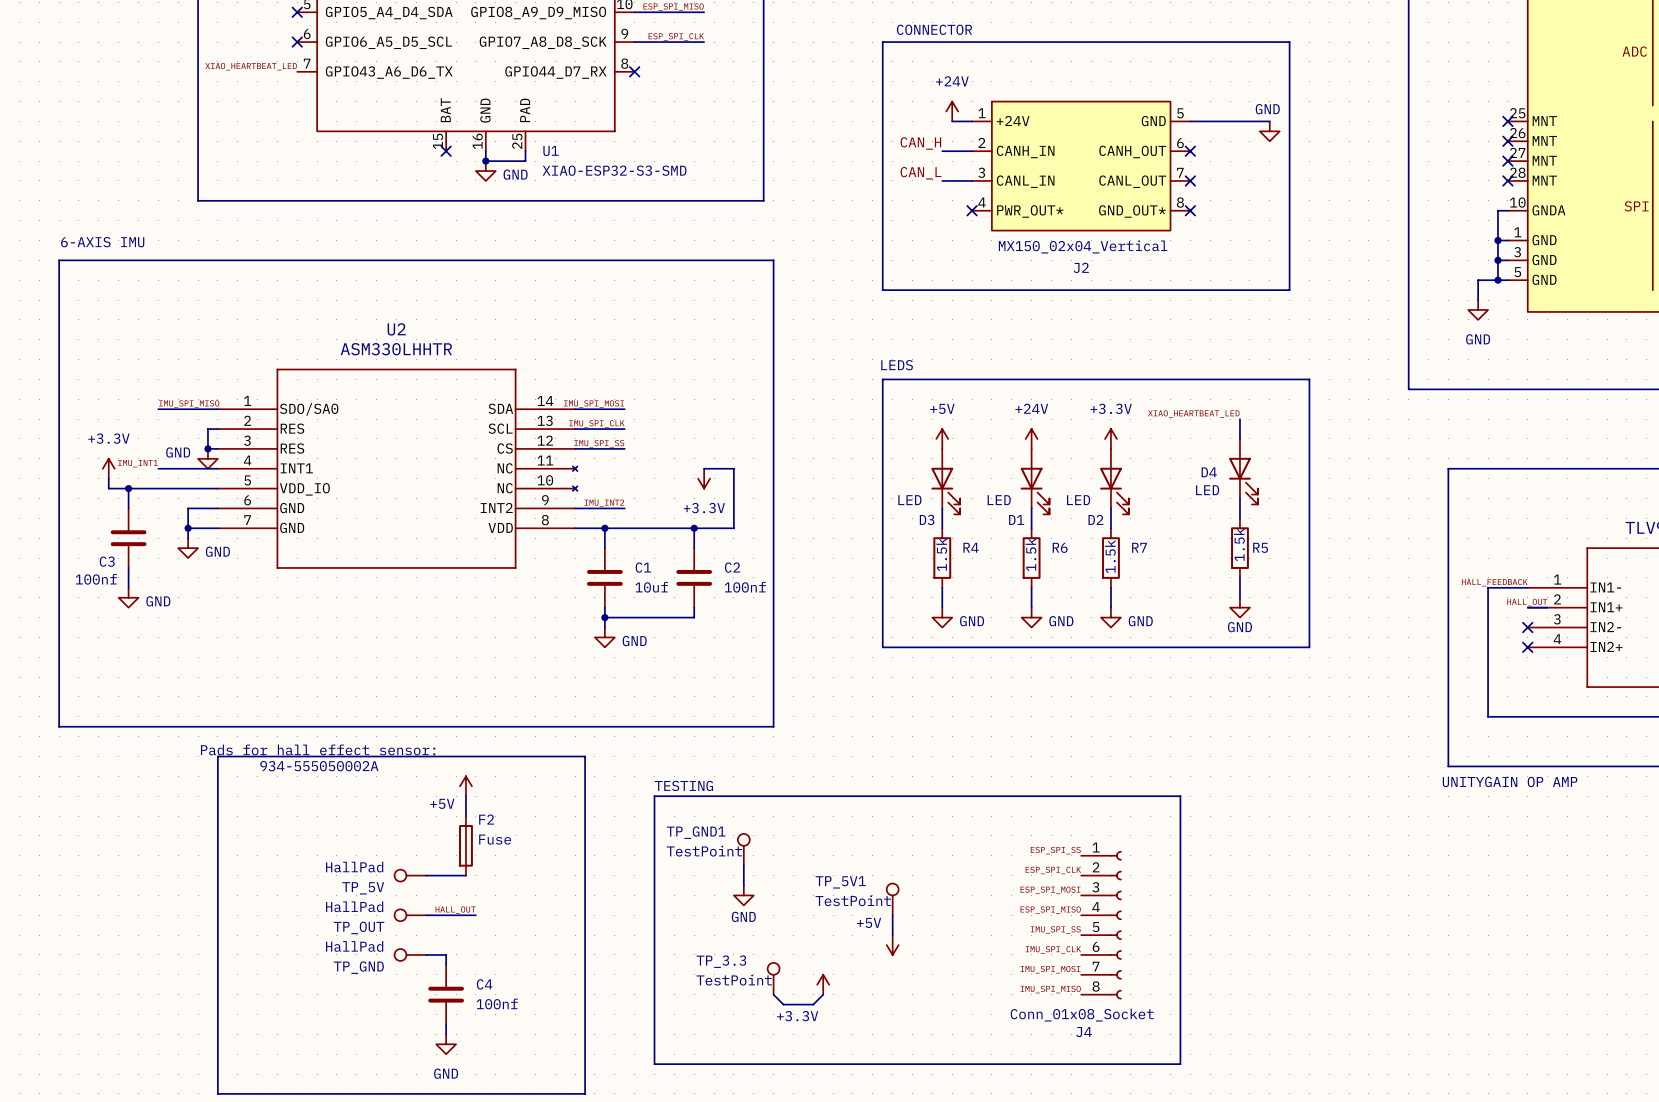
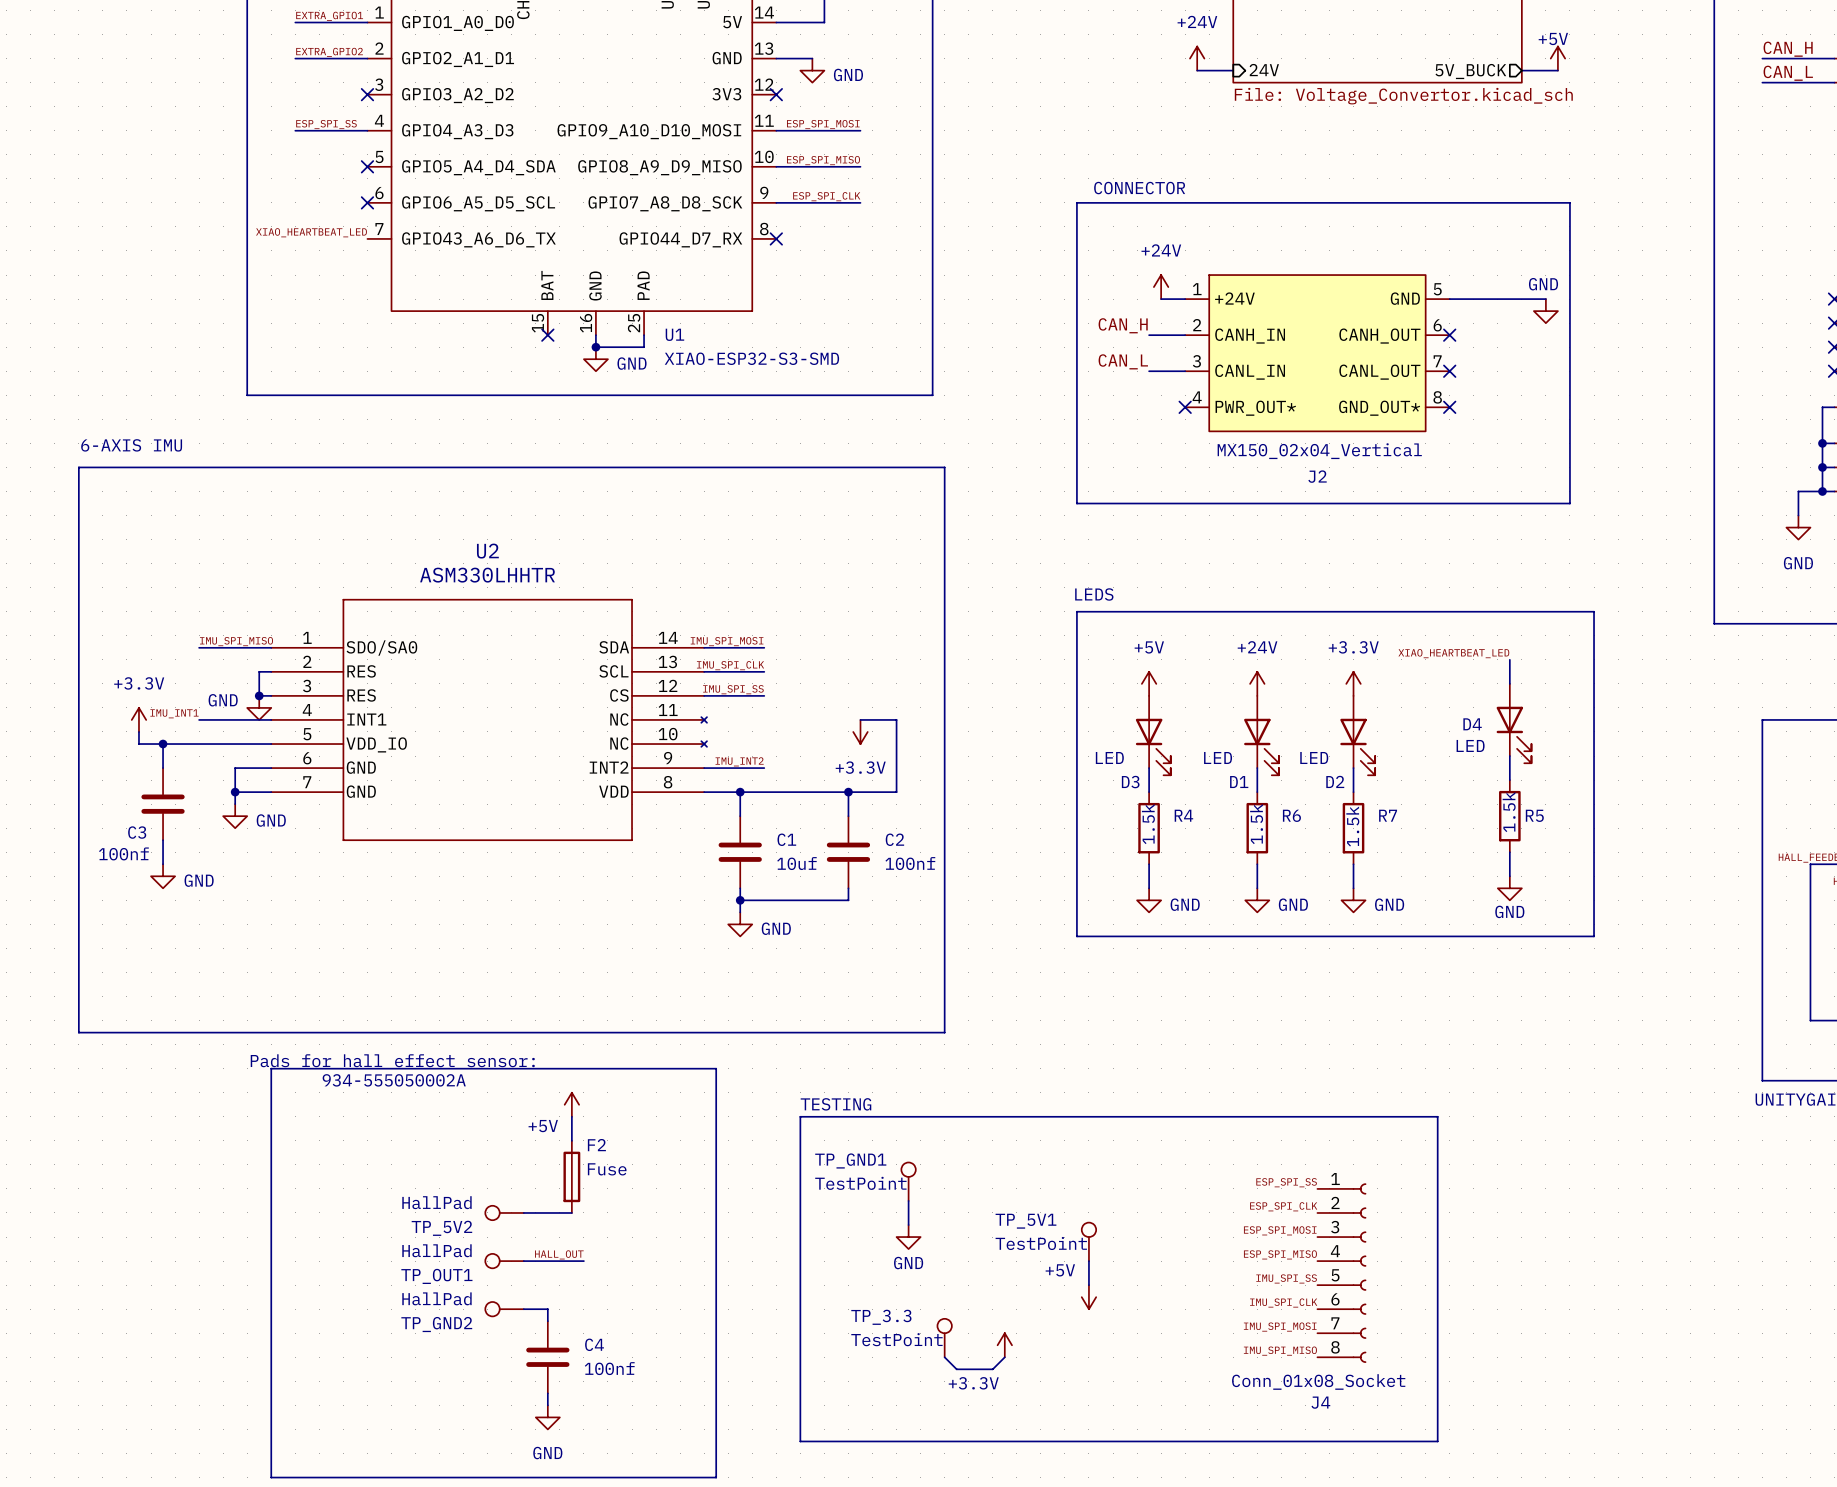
TP_5V name: TP_5V (363, 888) -> TP_5V2 (441, 1228)
TP_OUT name: TP_OUT (359, 927) -> TP_OUT1 (436, 1276)
TP_GND name: TP_GND (358, 967) -> TP_GND2 (436, 1324)

